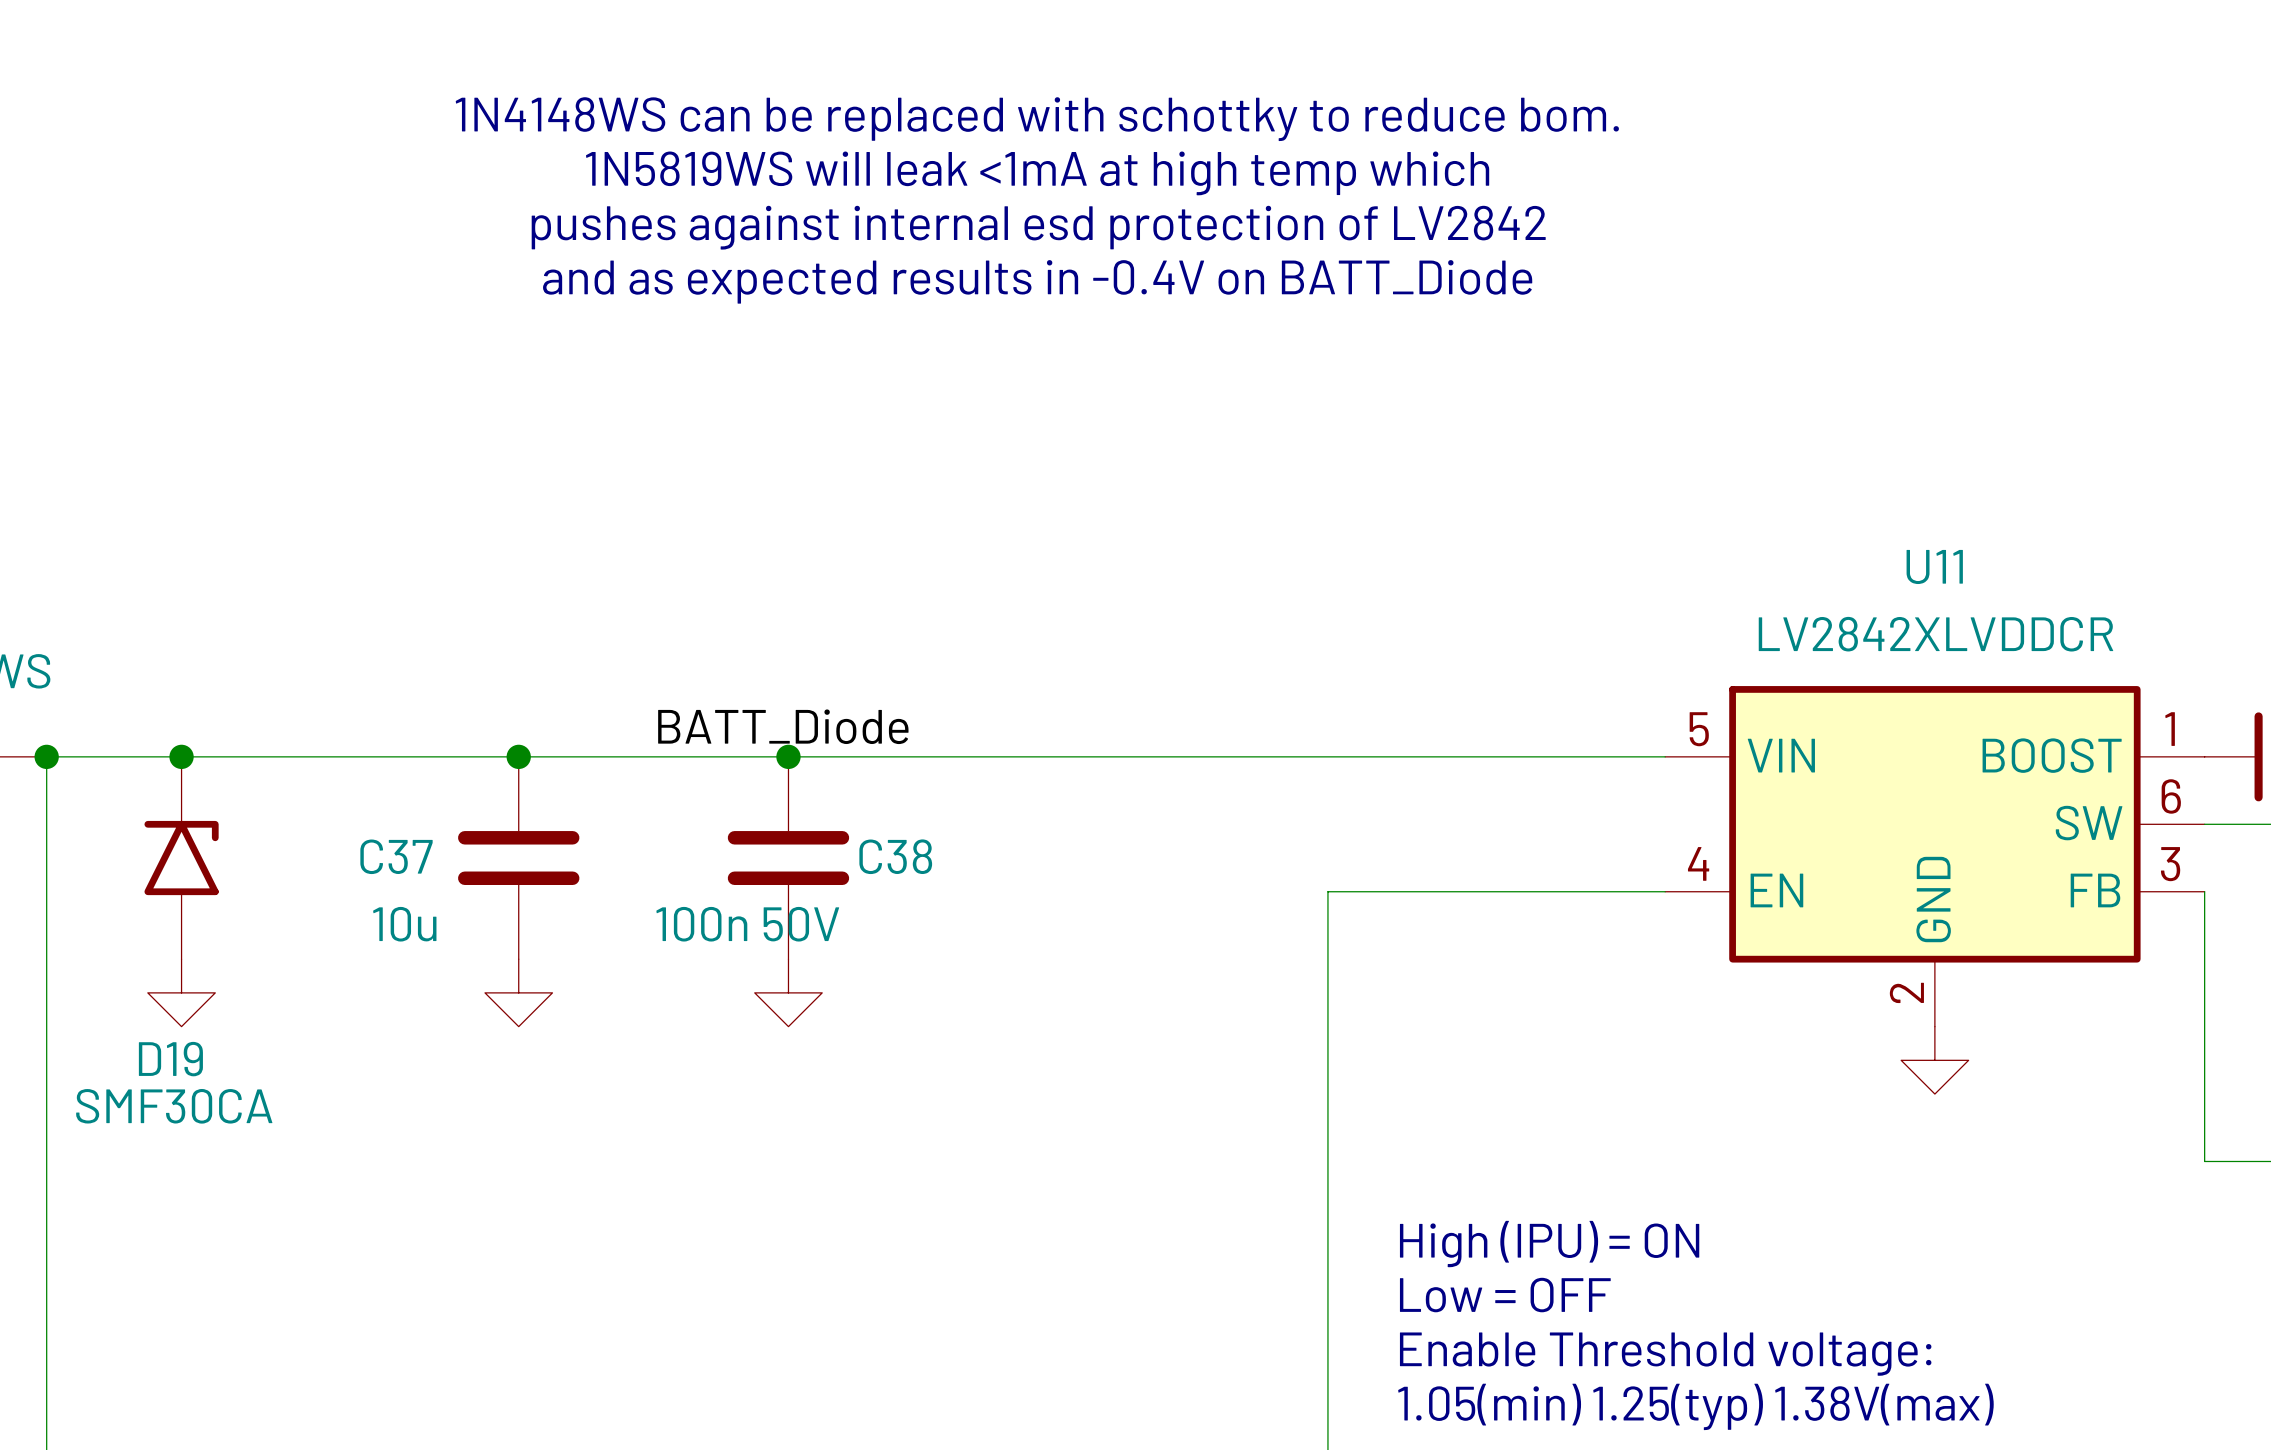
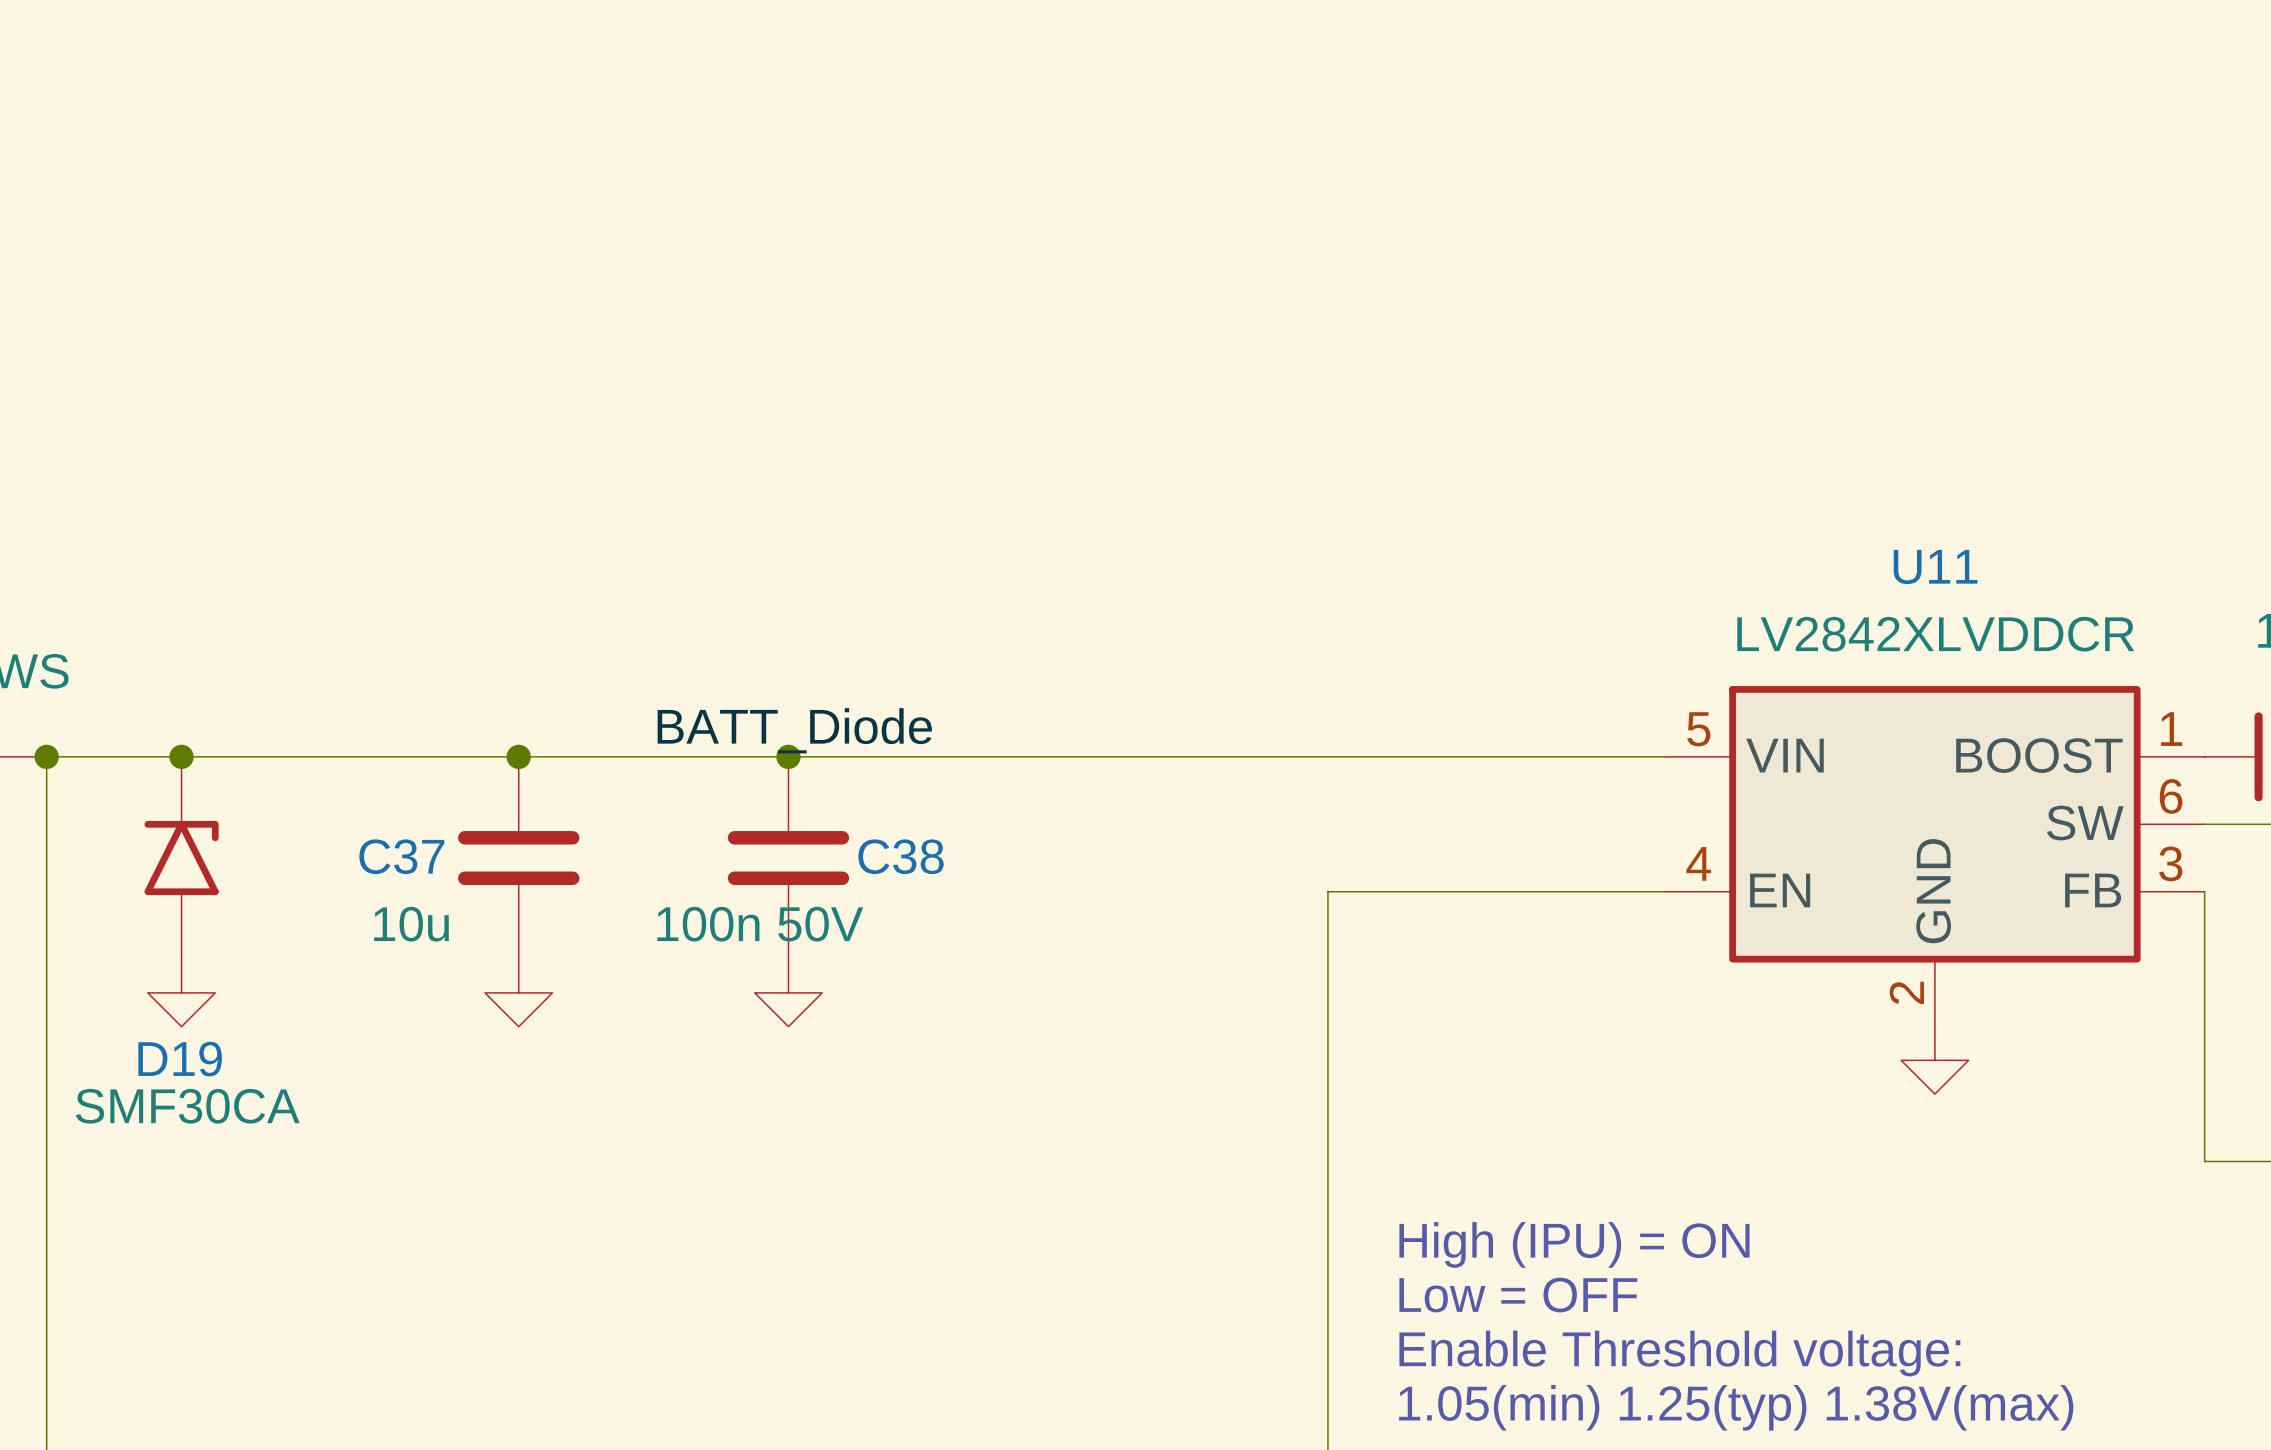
text: 1N4148WS can be replaced with schottky to reduce bom. (1037, 119) -> none
text: 1N5819WS will leak <1mA at high temp which (1037, 173) -> none
text: pushes against internal esd protection of LV2842 (1038, 227) -> none
text: and as expected results in -0.4V on BATT_Diode (1037, 281) -> none

